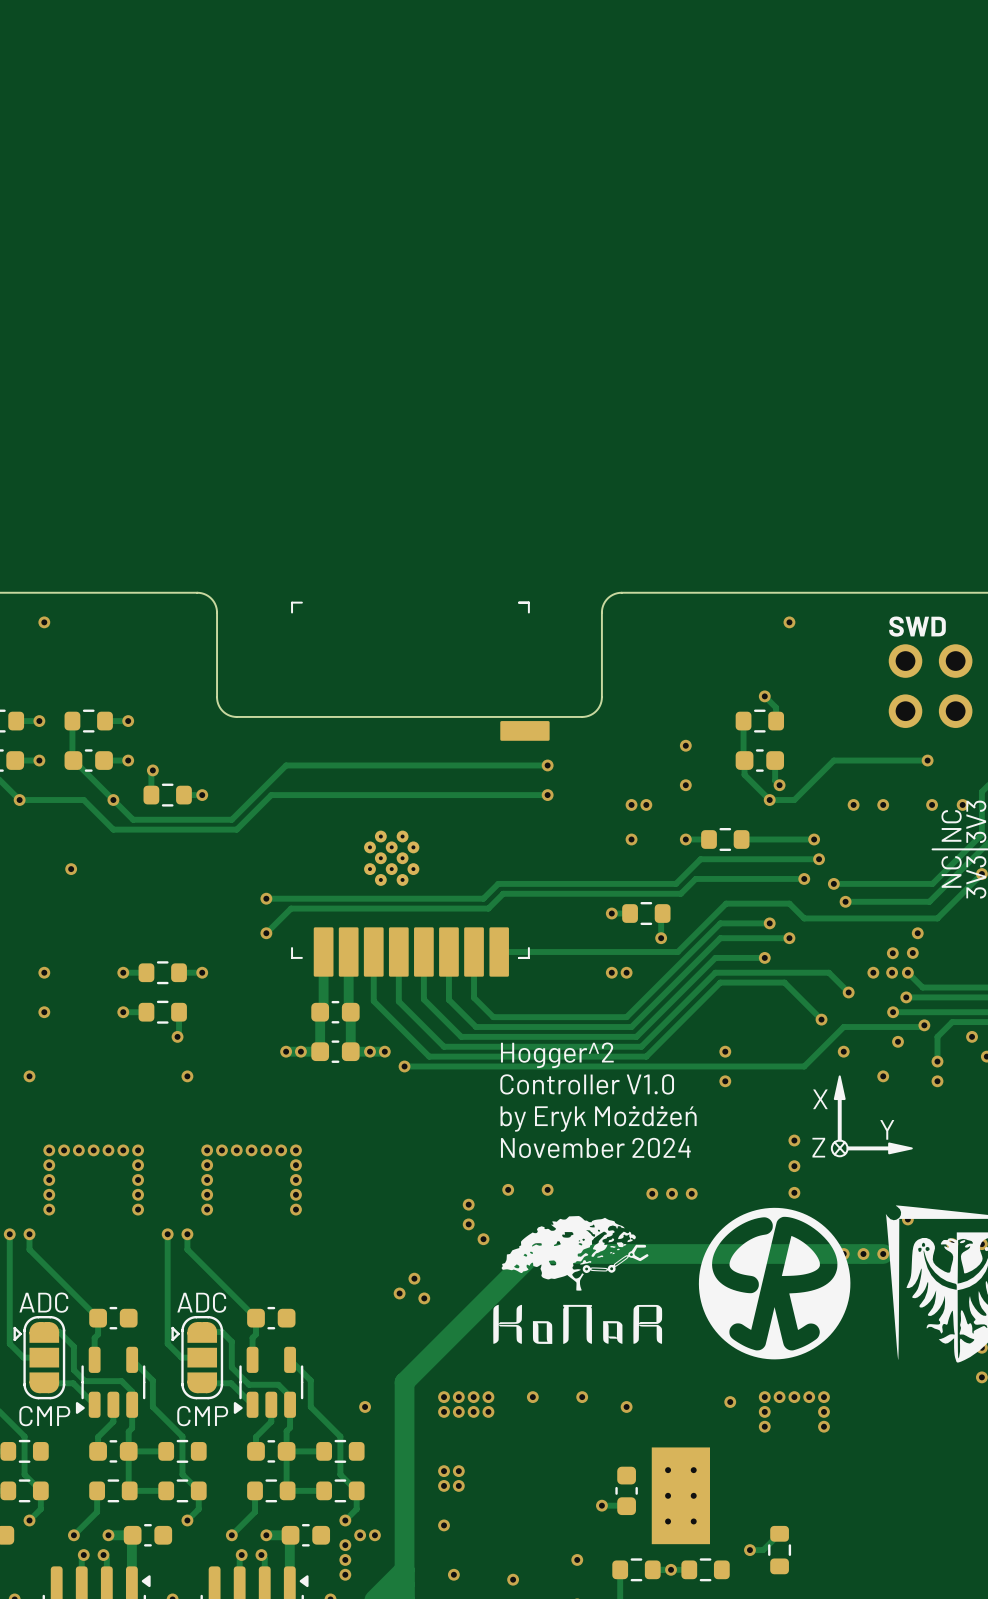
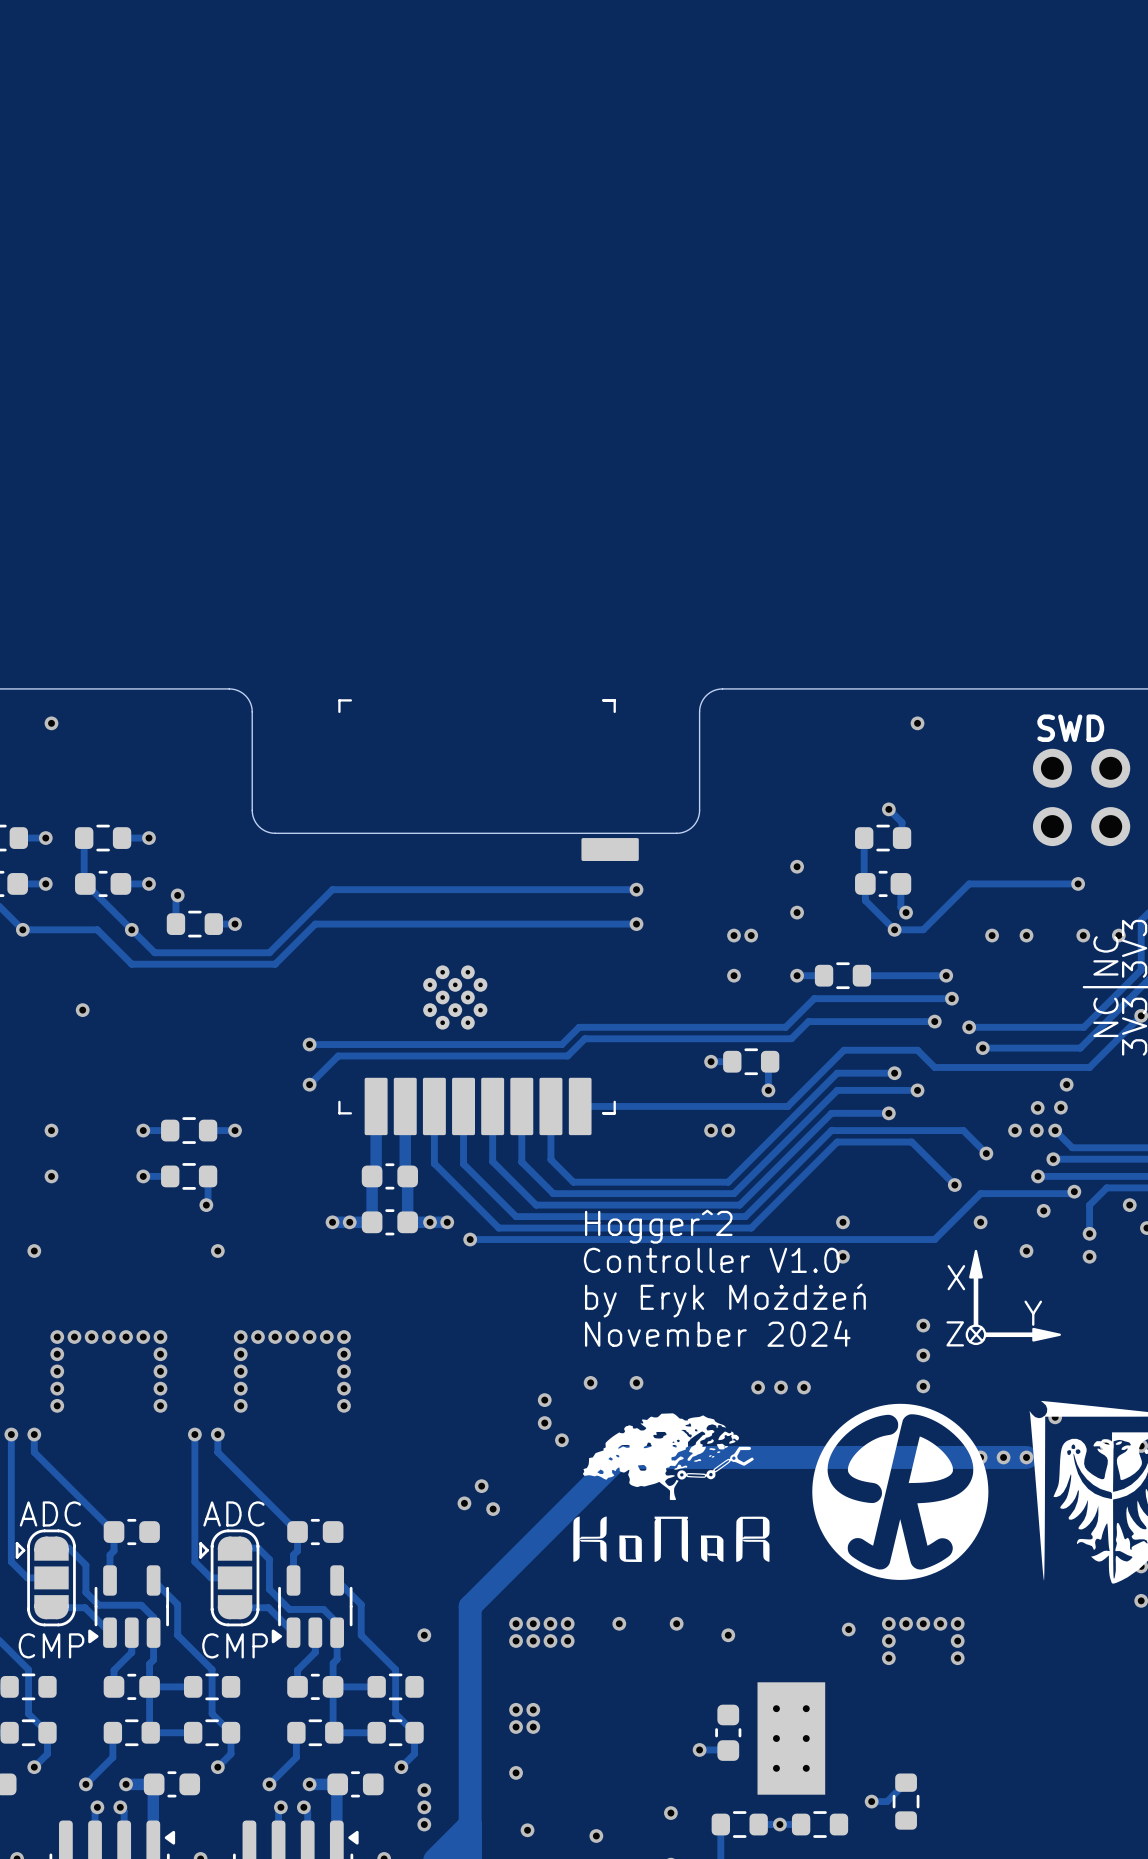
via: (360, 1535) -> none
via: (374, 1535) -> none
via: none -> (424, 1790)
via: (345, 1545) -> none
via: none -> (424, 1807)
via: (345, 1559) -> none
via: none -> (424, 1824)
via: (345, 1574) -> none

